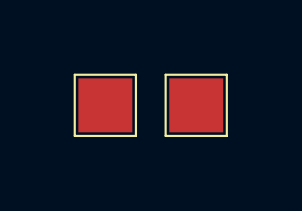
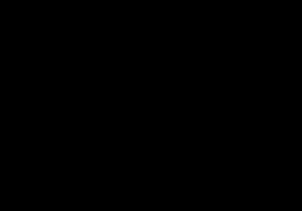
part: (105, 105) -> none
part: (196, 105) -> none

